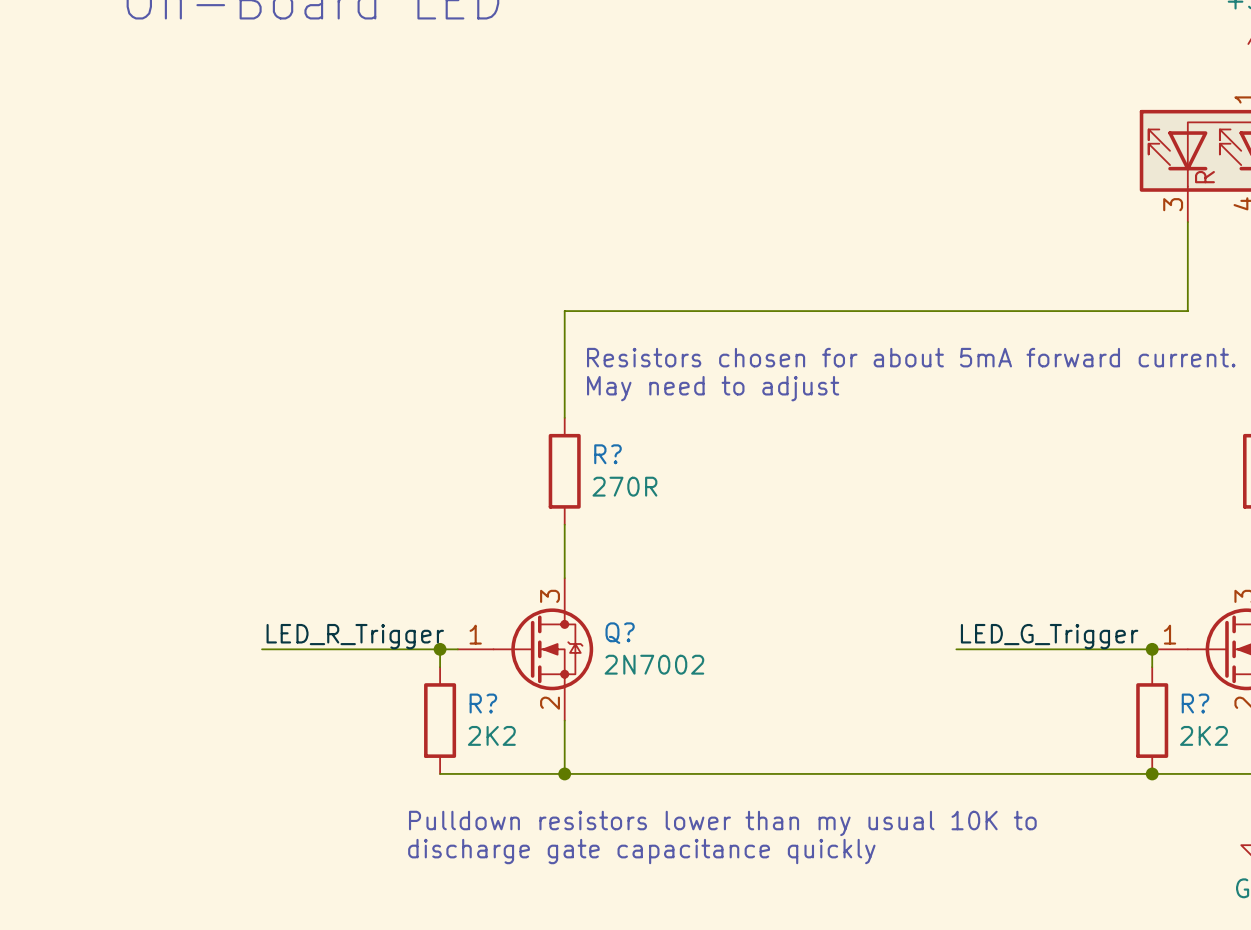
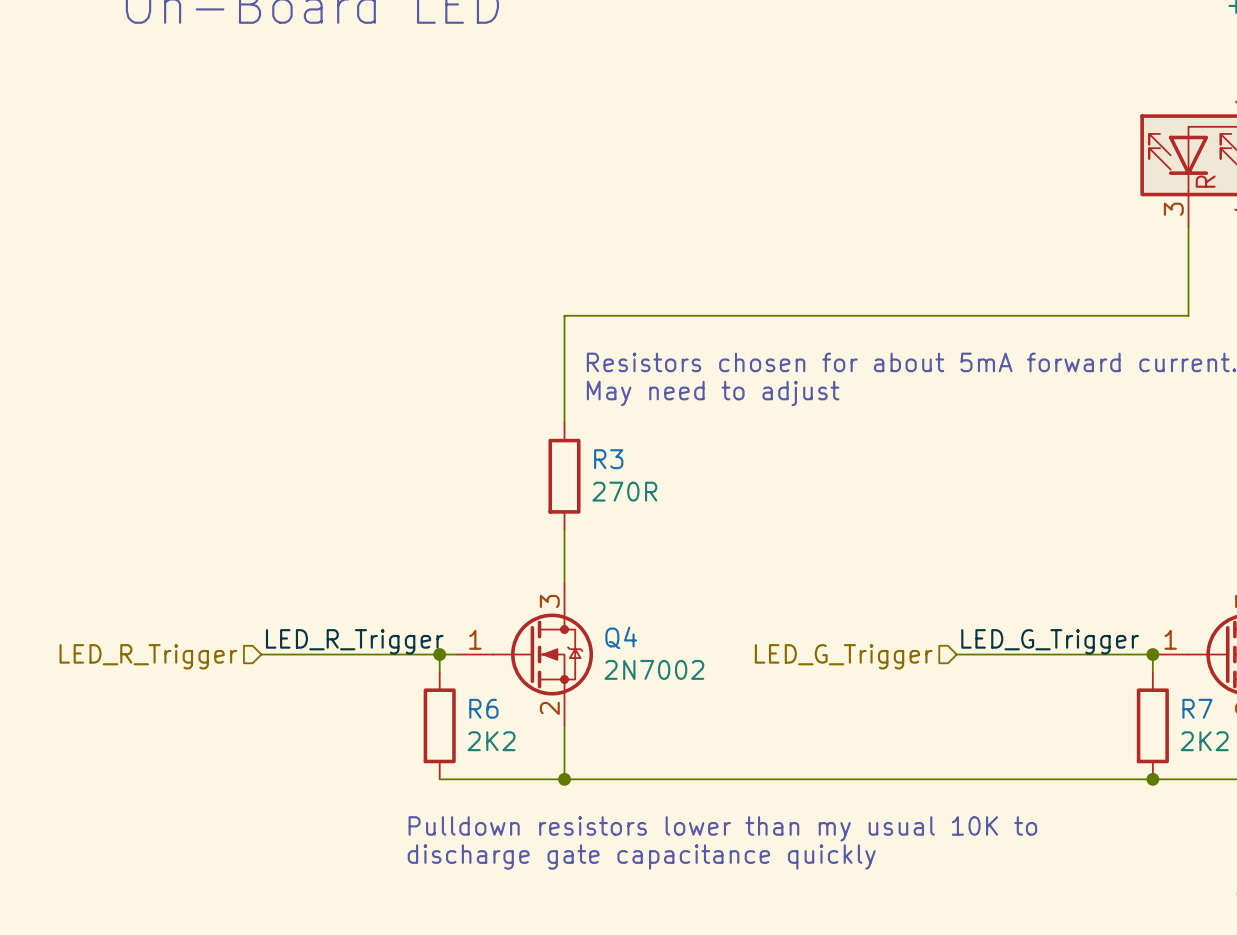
R? name: R? (607, 454) -> R3 (608, 459)
Q? name: Q? (620, 633) -> Q4 (621, 637)
hierarchical label: none -> LED_R_Trigger (148, 656)
hierarchical label: none -> LED_G_Trigger (843, 656)
R? name: R? (483, 703) -> R6 (483, 708)
R? name: R? (1195, 703) -> R7 (1197, 708)

